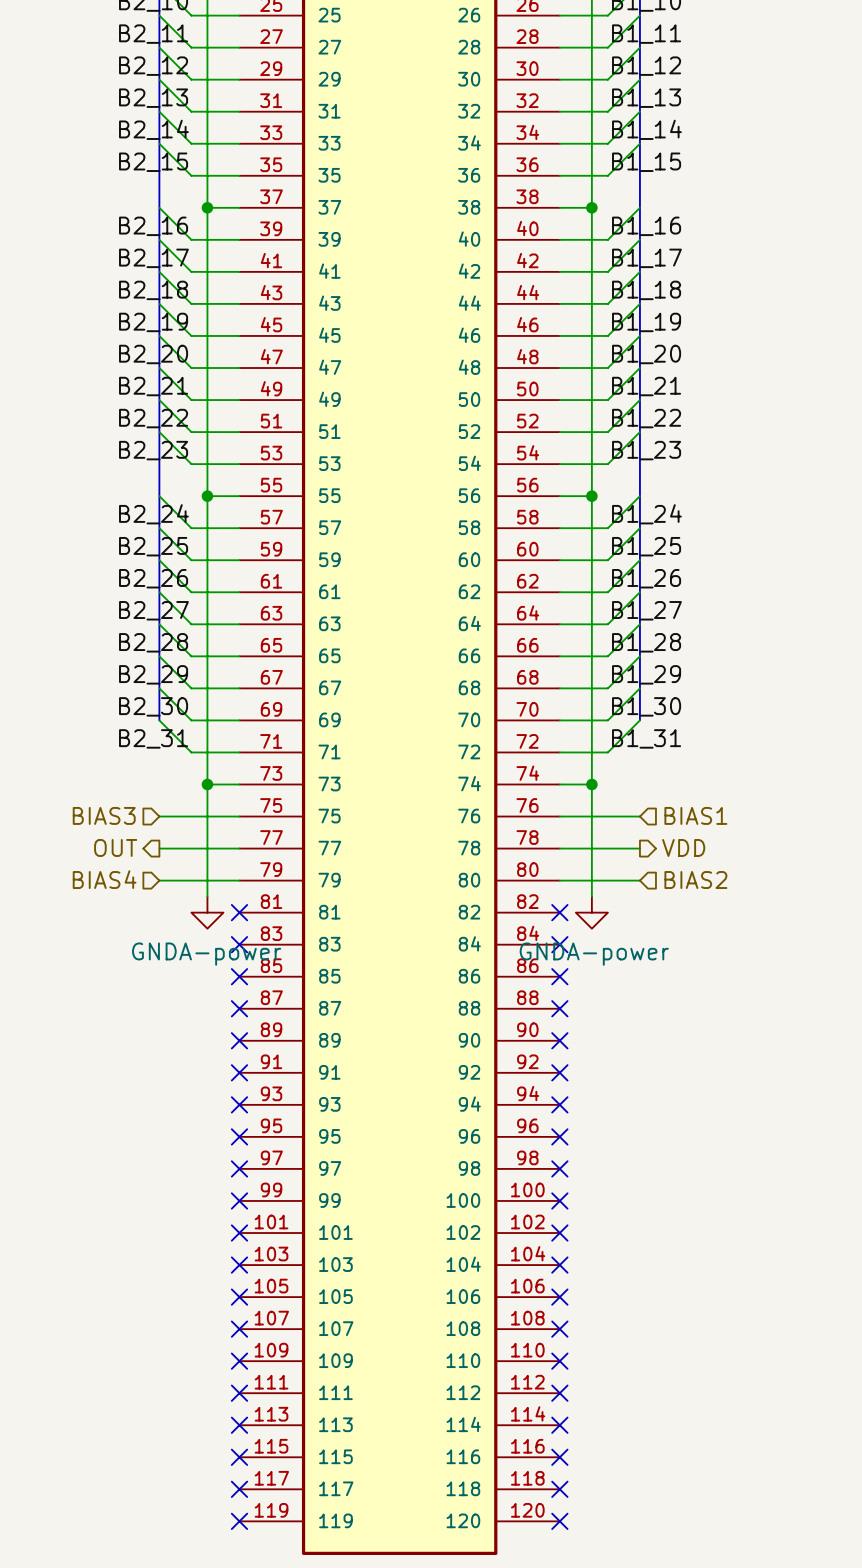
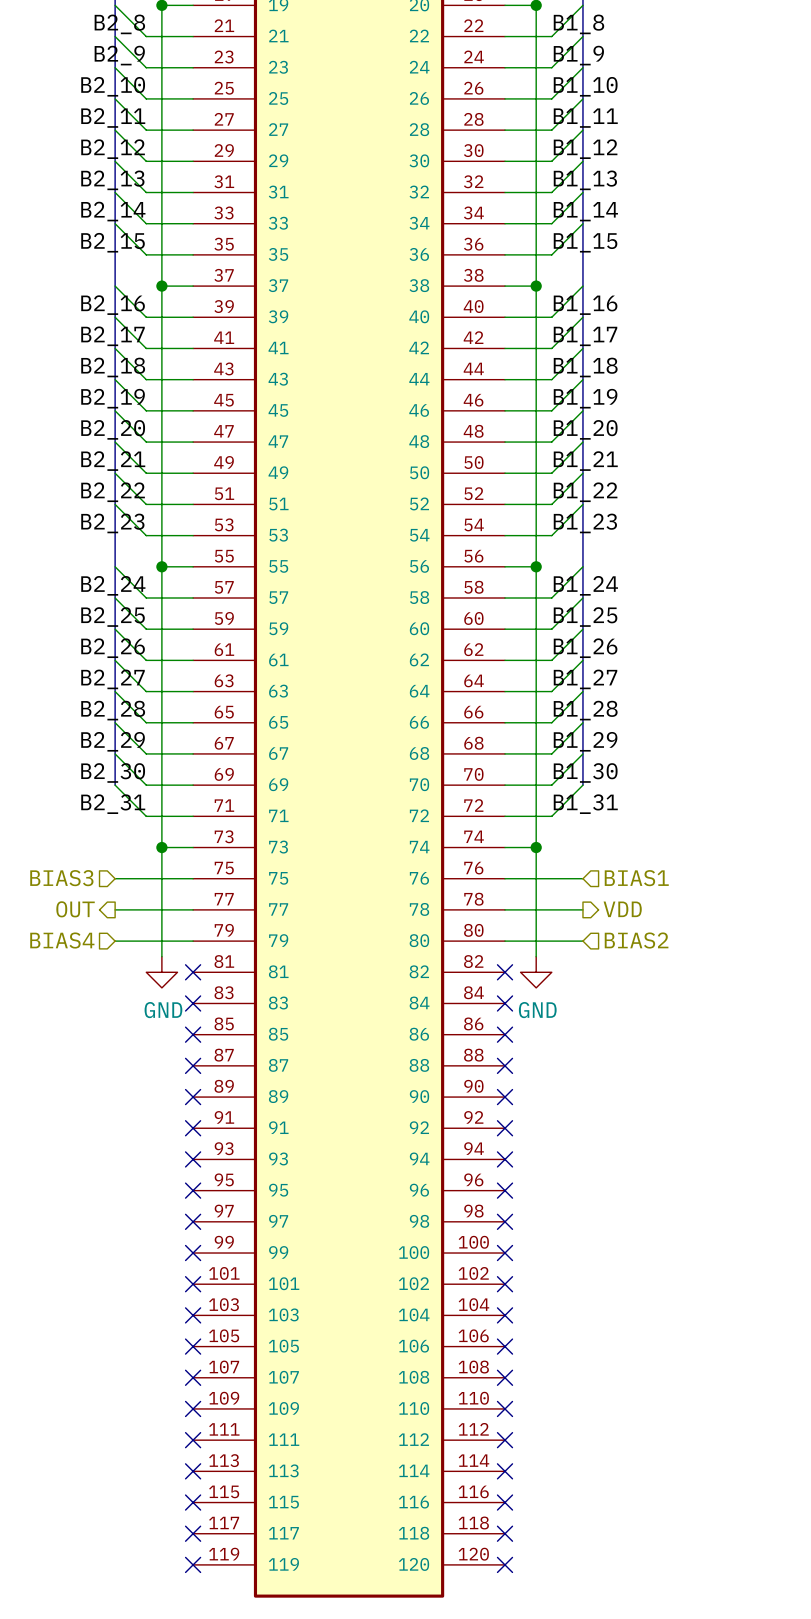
power symbol: GNDA-power (207, 912) -> GND (161, 972)
power symbol: GNDA-power (591, 912) -> GND (536, 972)

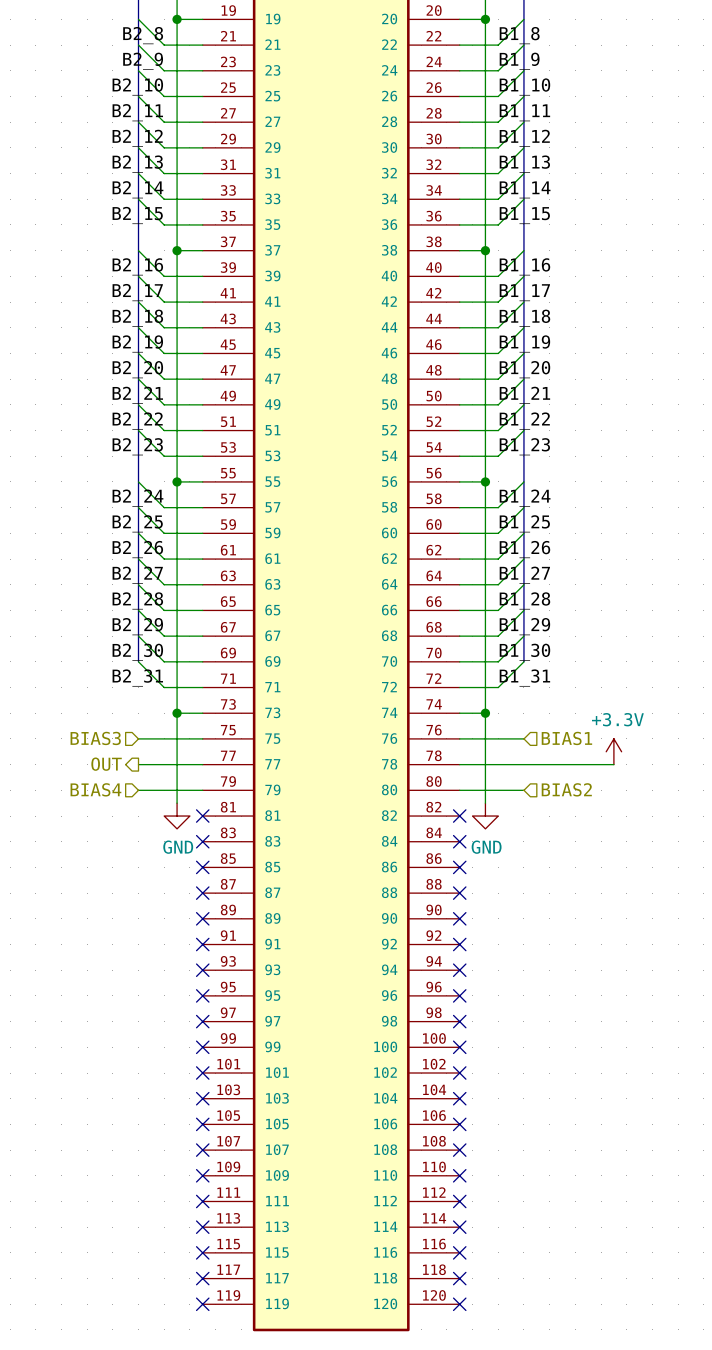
power symbol: none -> +3.3V (613, 751)
wire: none -> (523, 764) (613, 764)
hierarchical label: VDD (622, 909) -> none

